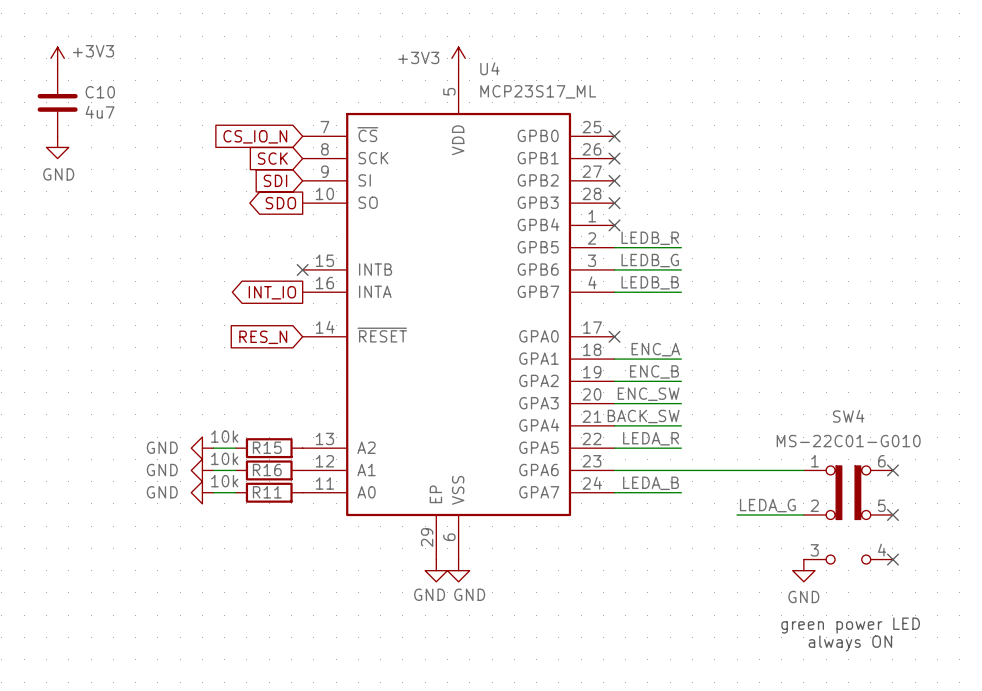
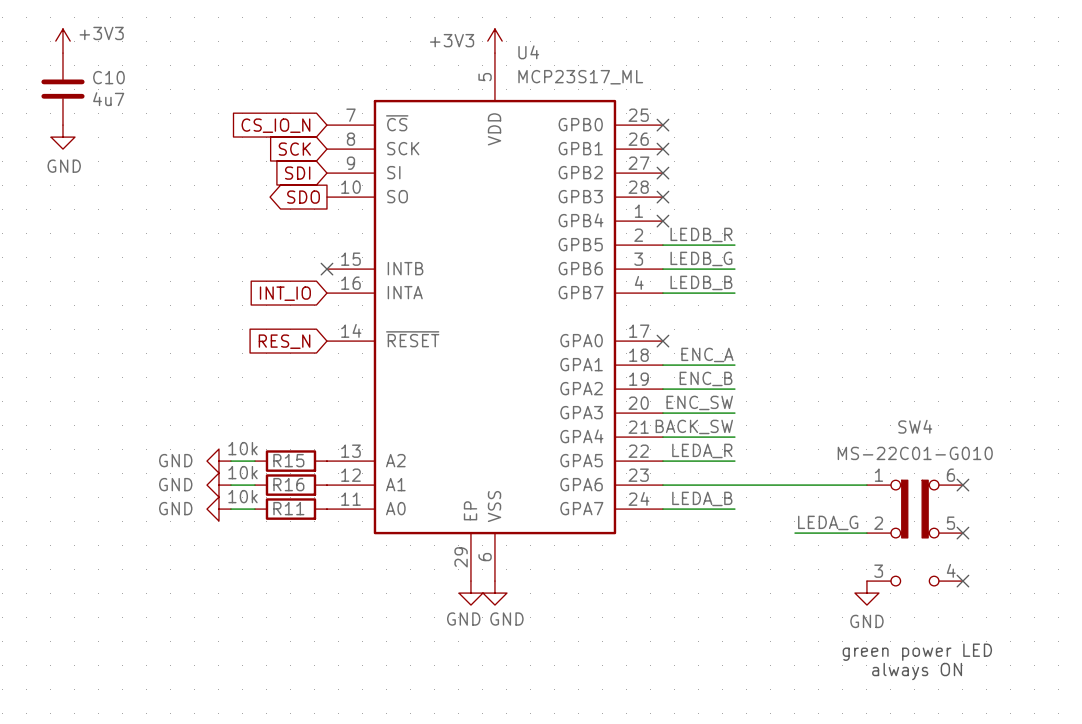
global label shape: output (272, 292) -> input (285, 293)

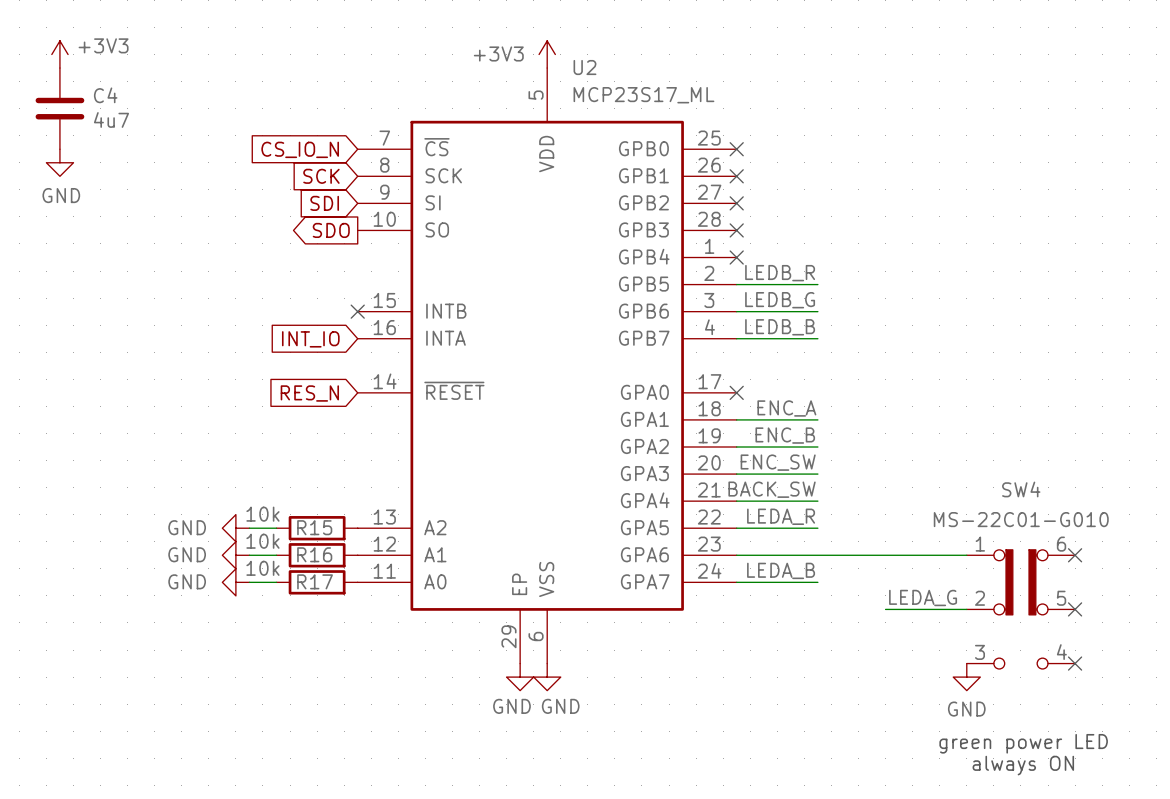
U4 name: U4 (528, 52) -> U2 (584, 67)
C10 name: C10 (108, 77) -> C4 (105, 95)
R11 name: R11 (288, 508) -> R17 (315, 581)

